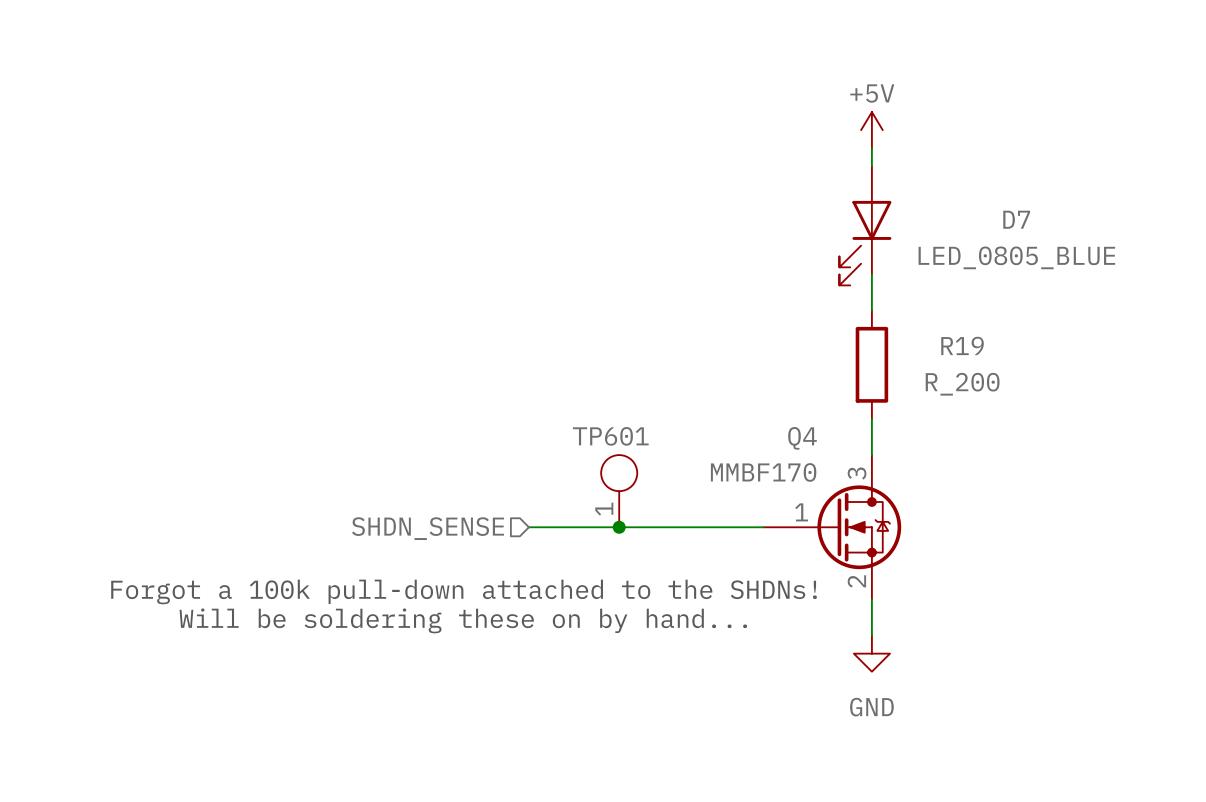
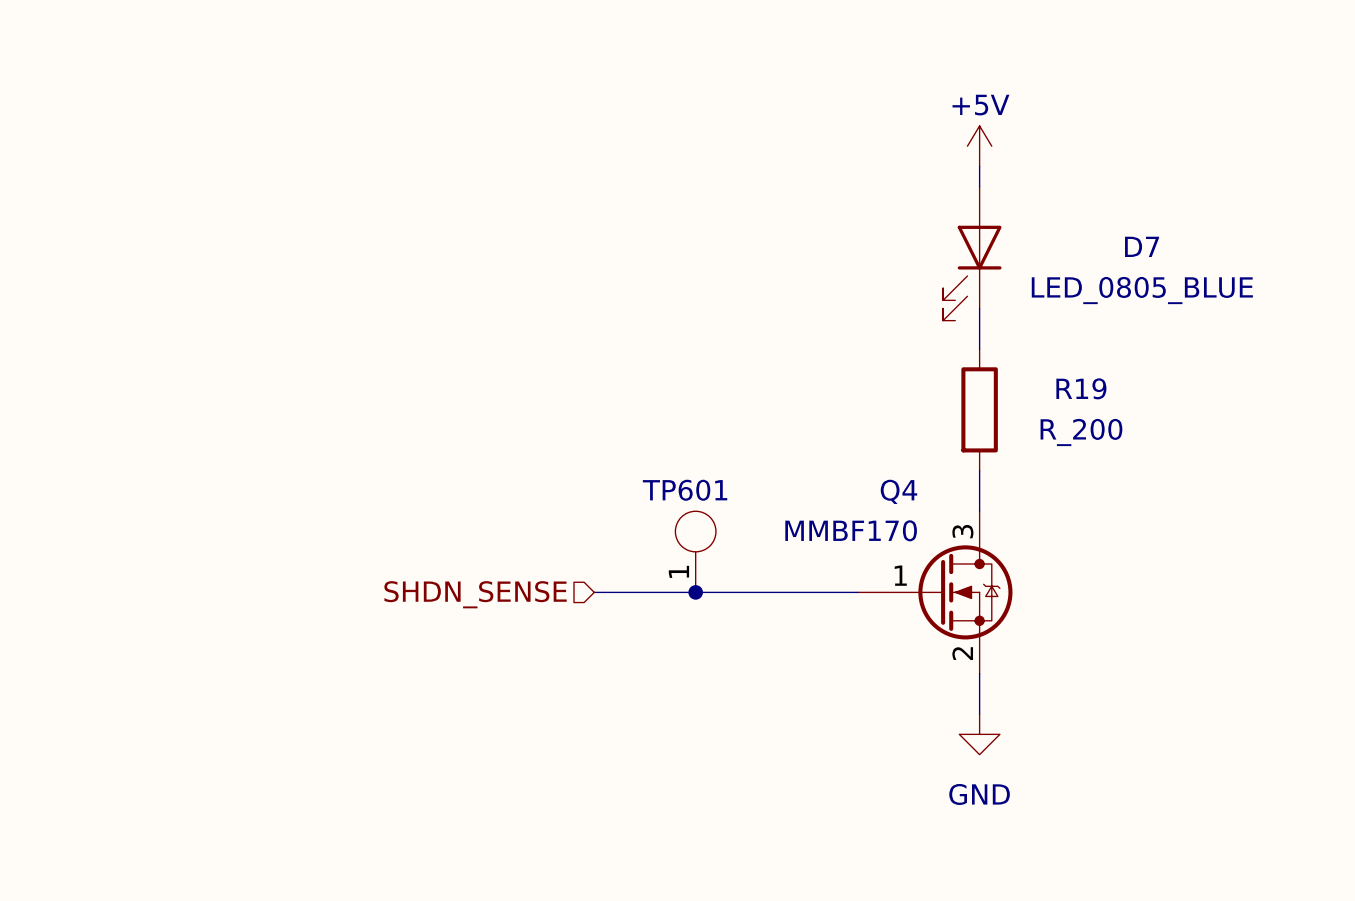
text: Forgot a 100k pull-down attached to the SHDNs! (464, 591) -> none
text: Will be soldering these on by hand... (463, 620) -> none

